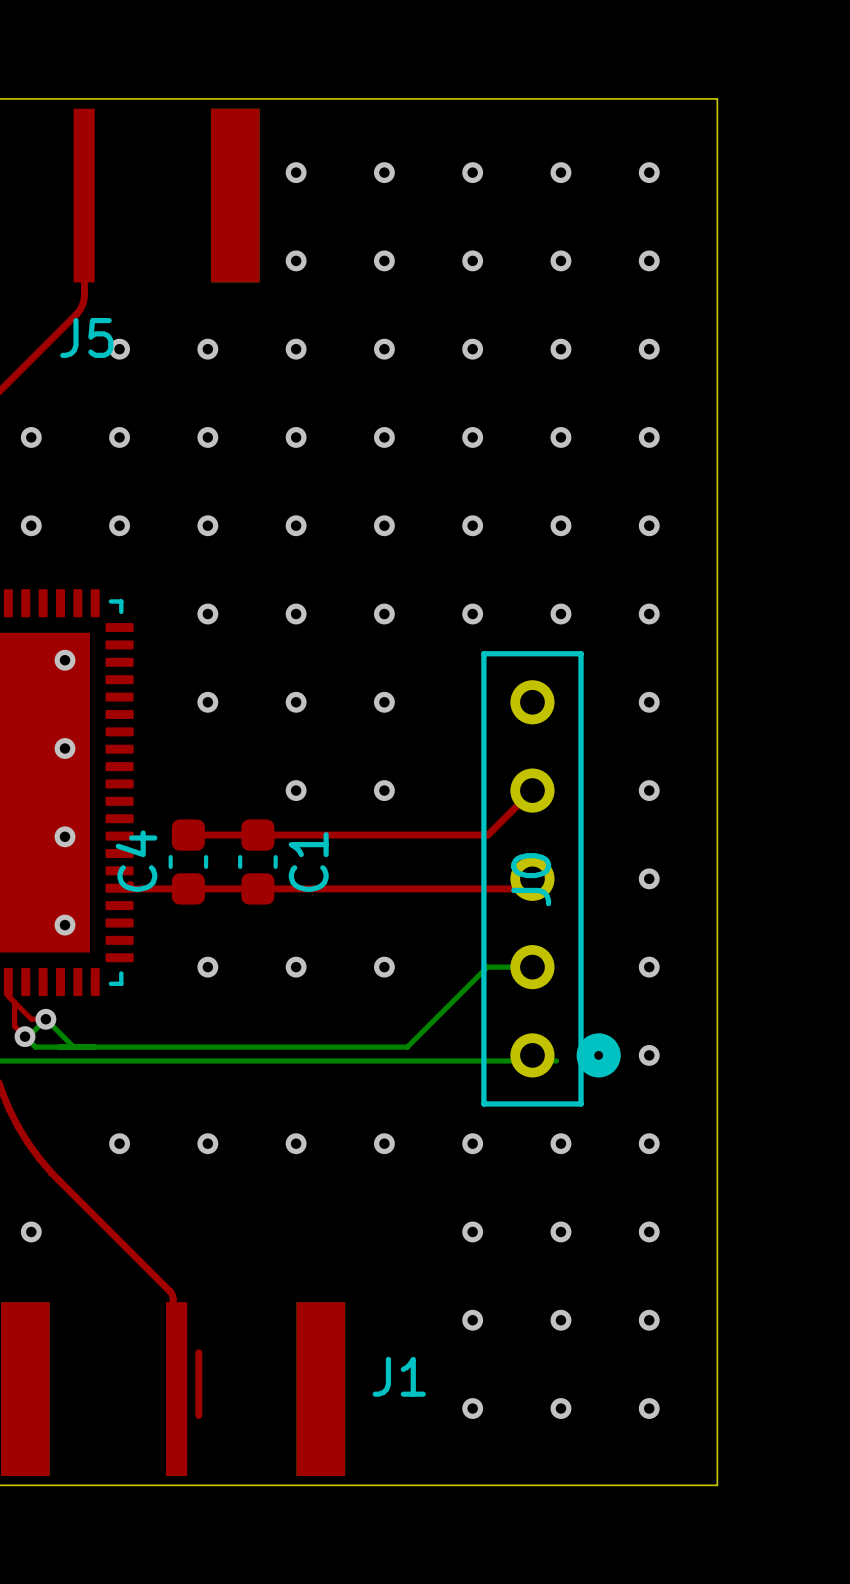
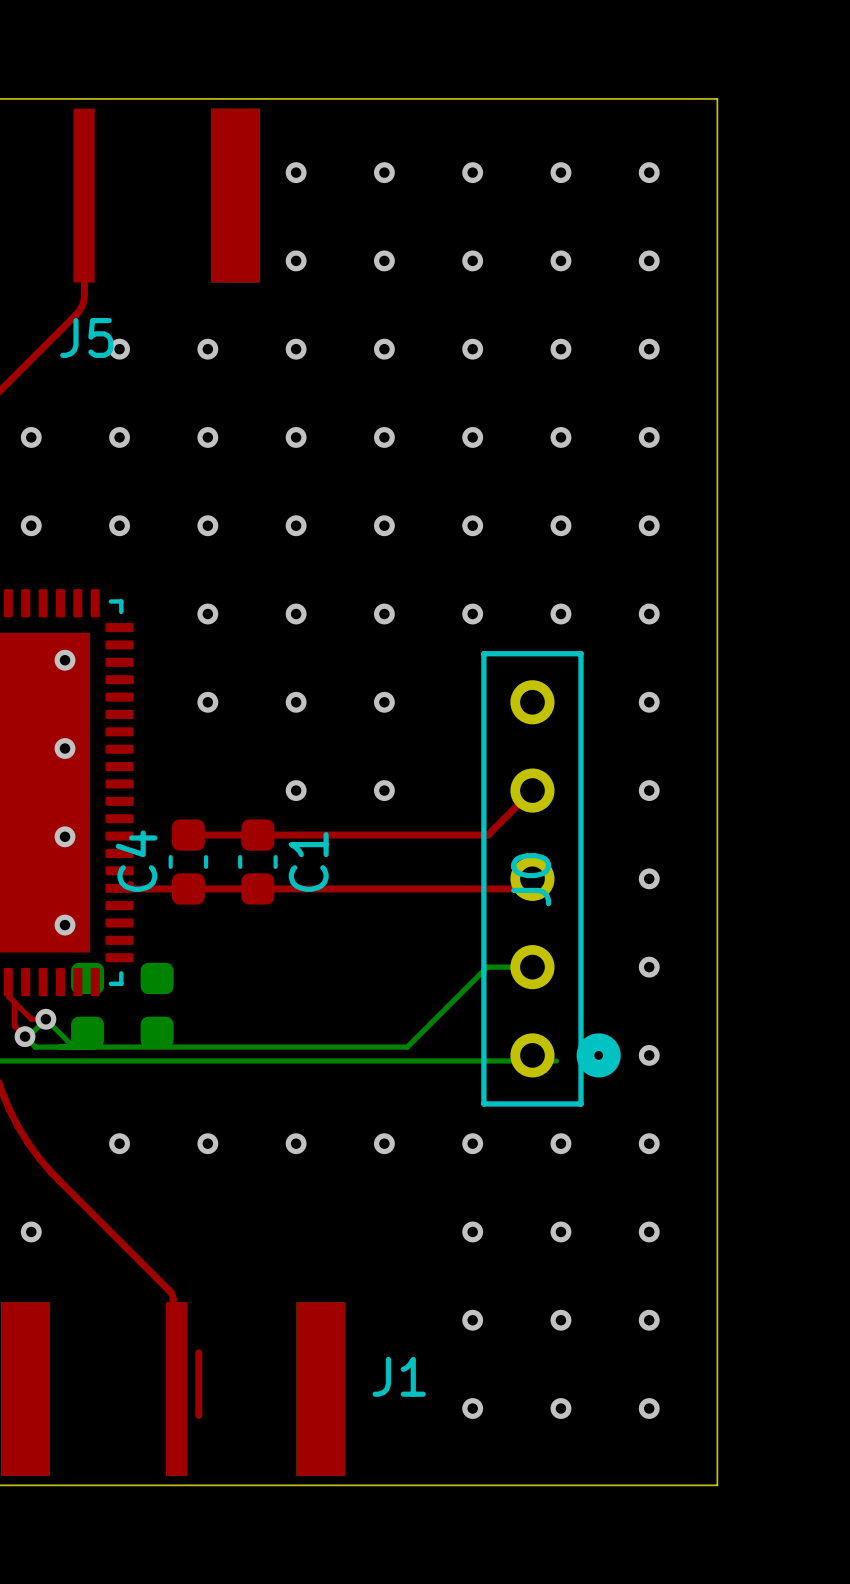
via: (207, 967) -> none
via: (296, 967) -> none
via: (384, 967) -> none
part: none -> (87, 1005)
part: none -> (157, 1005)

